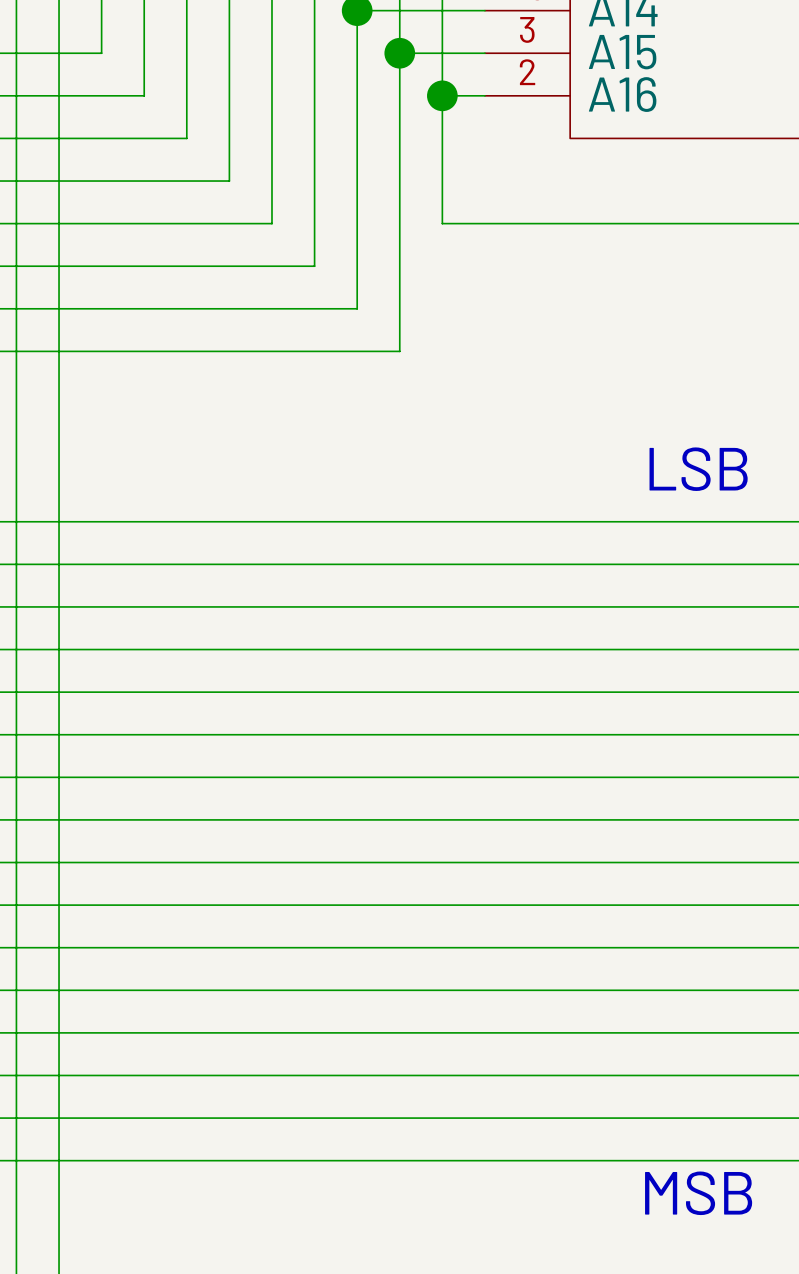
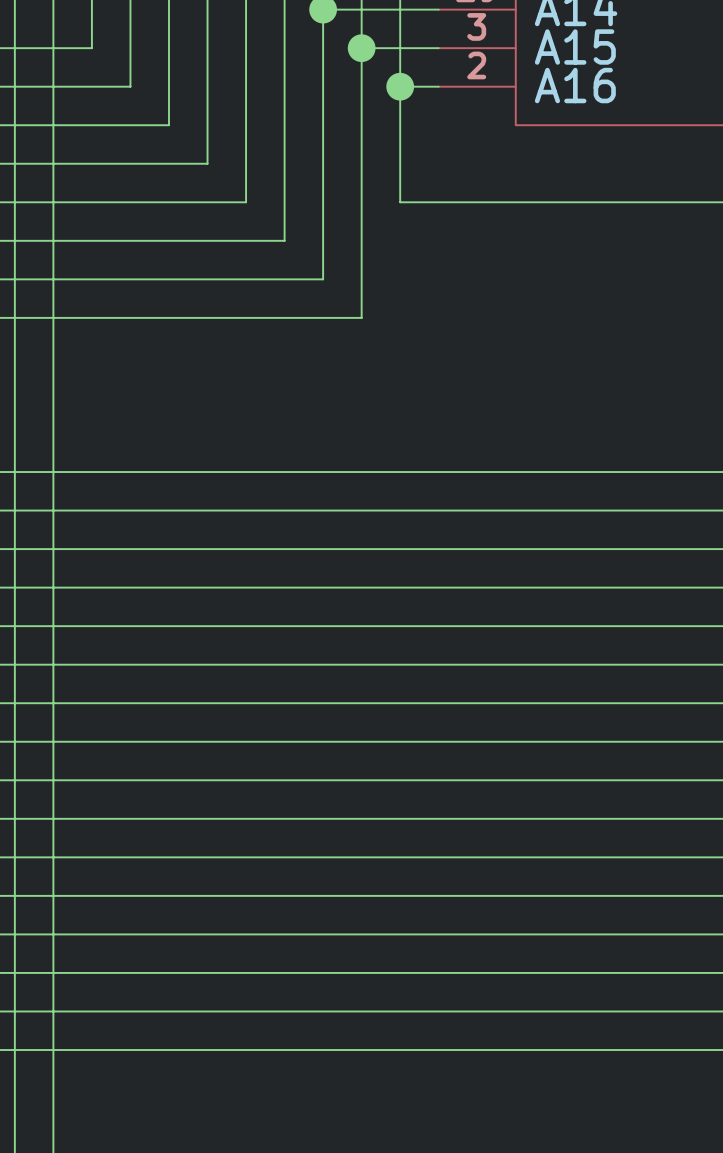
text: LSB (698, 469) -> none
text: MSB (698, 1193) -> none

